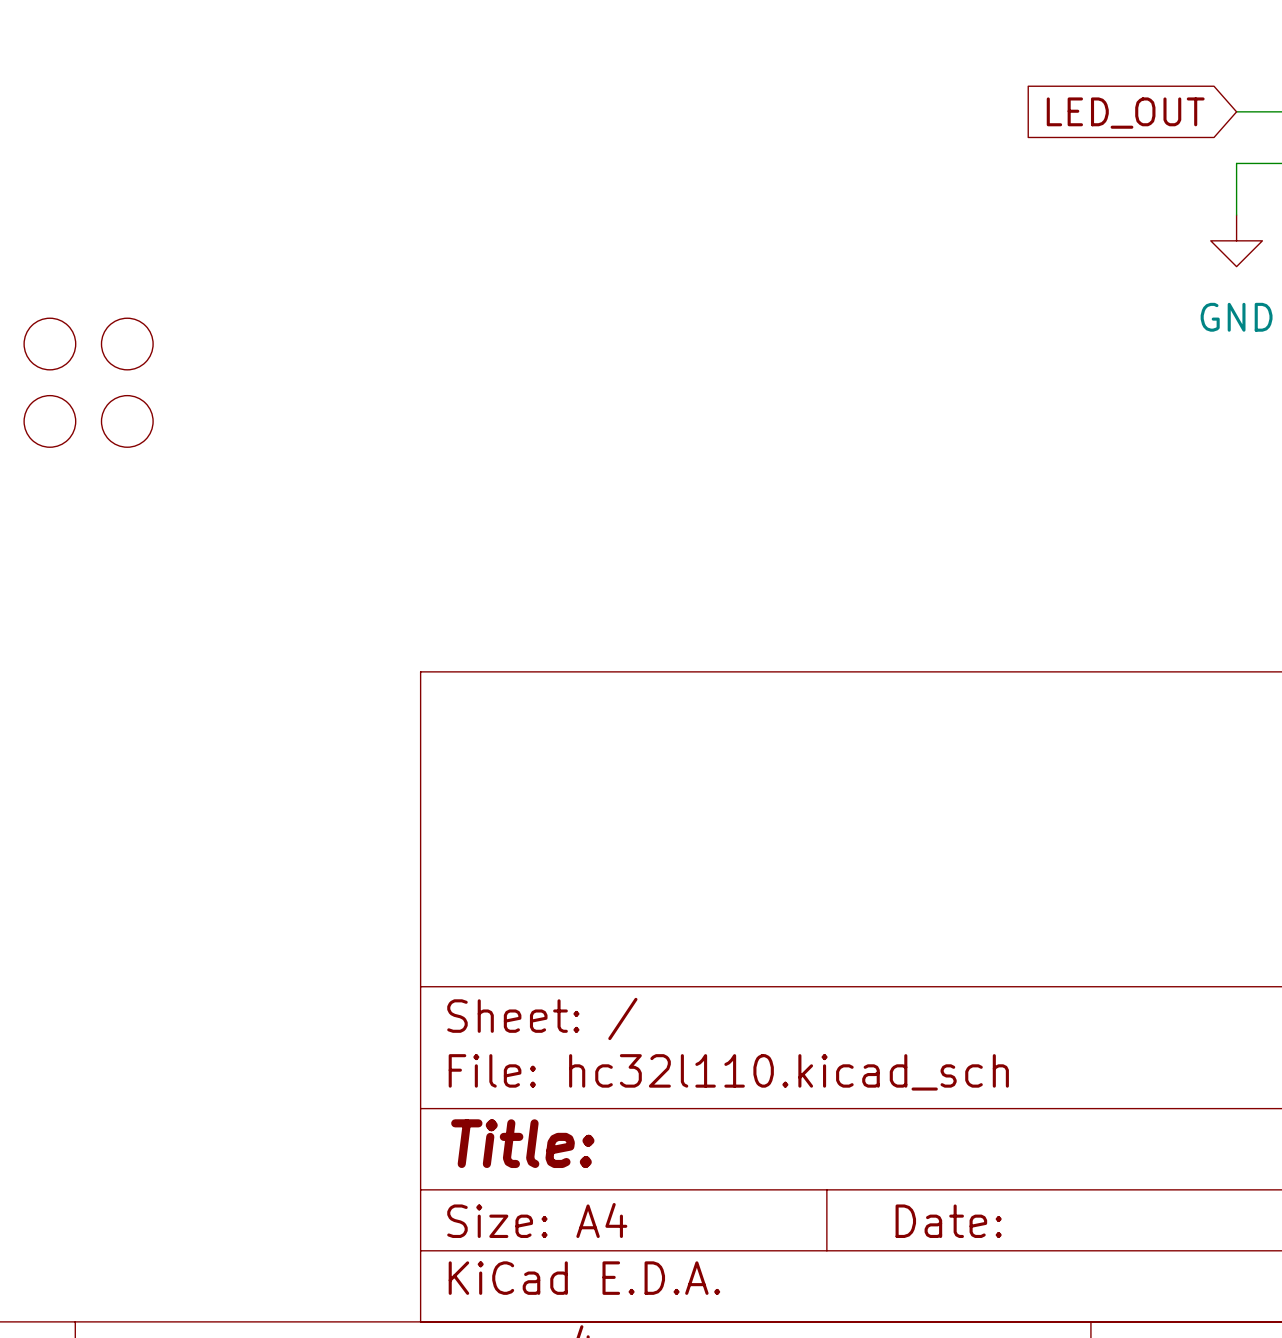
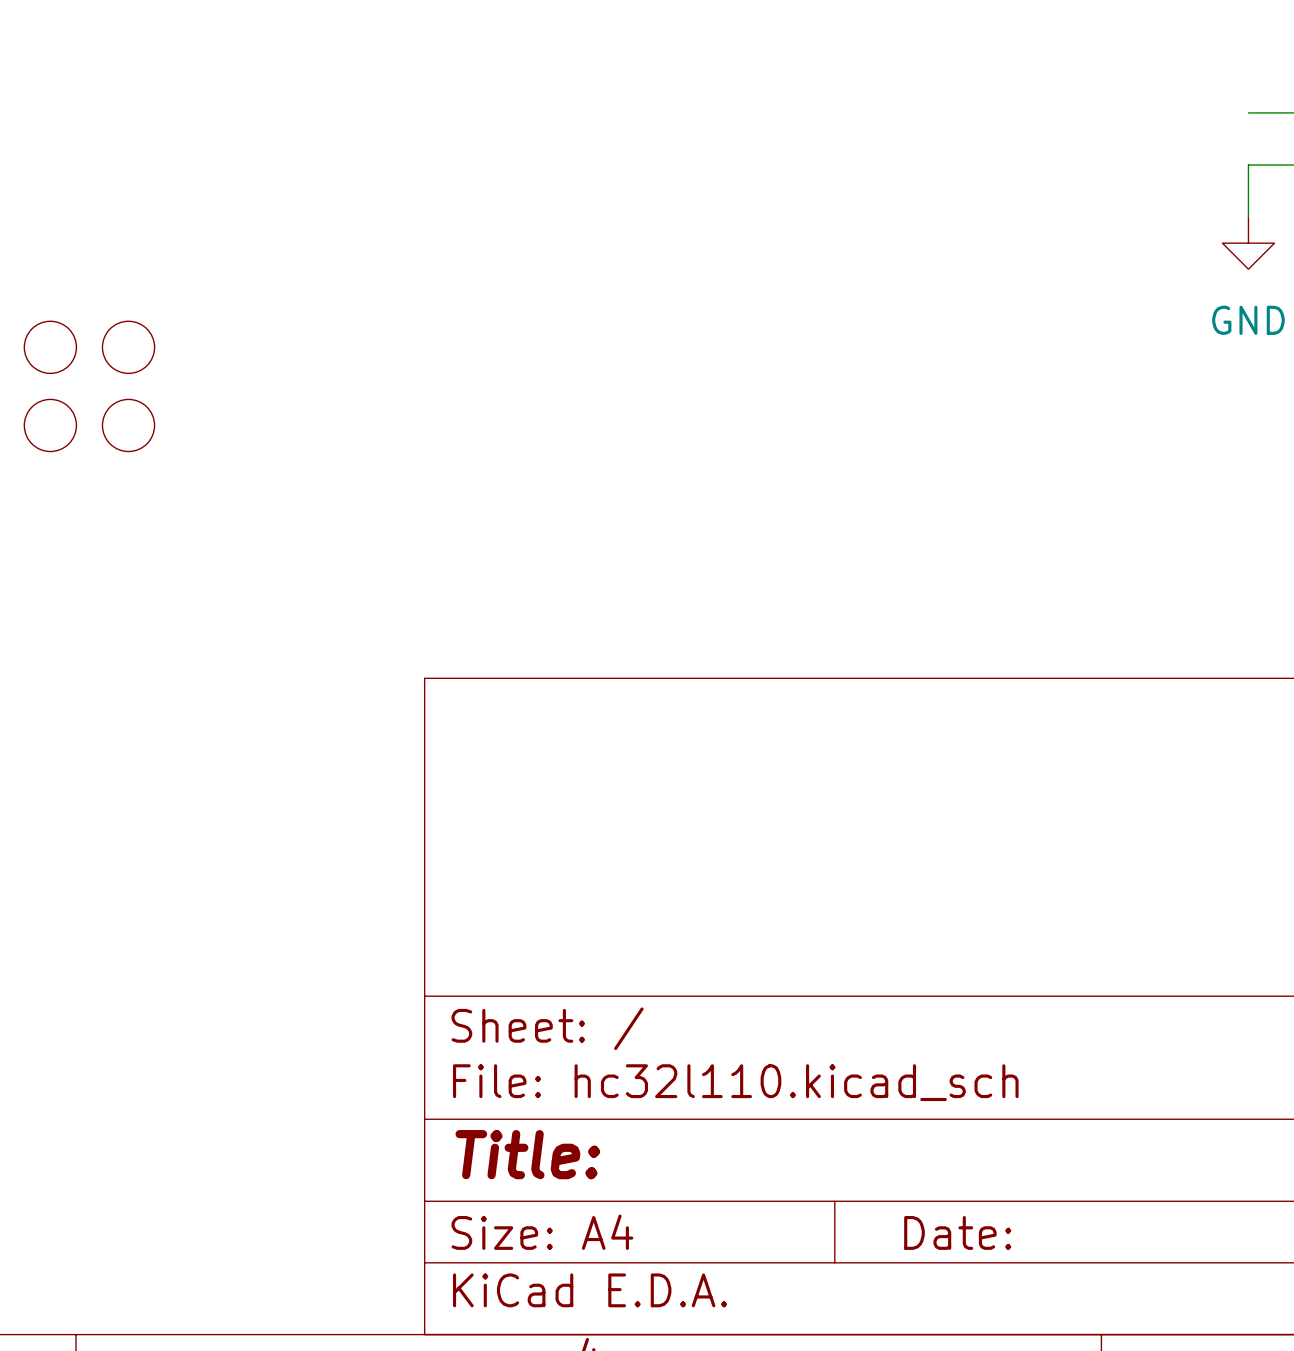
global label: LED_OUT (1125, 113) -> none

